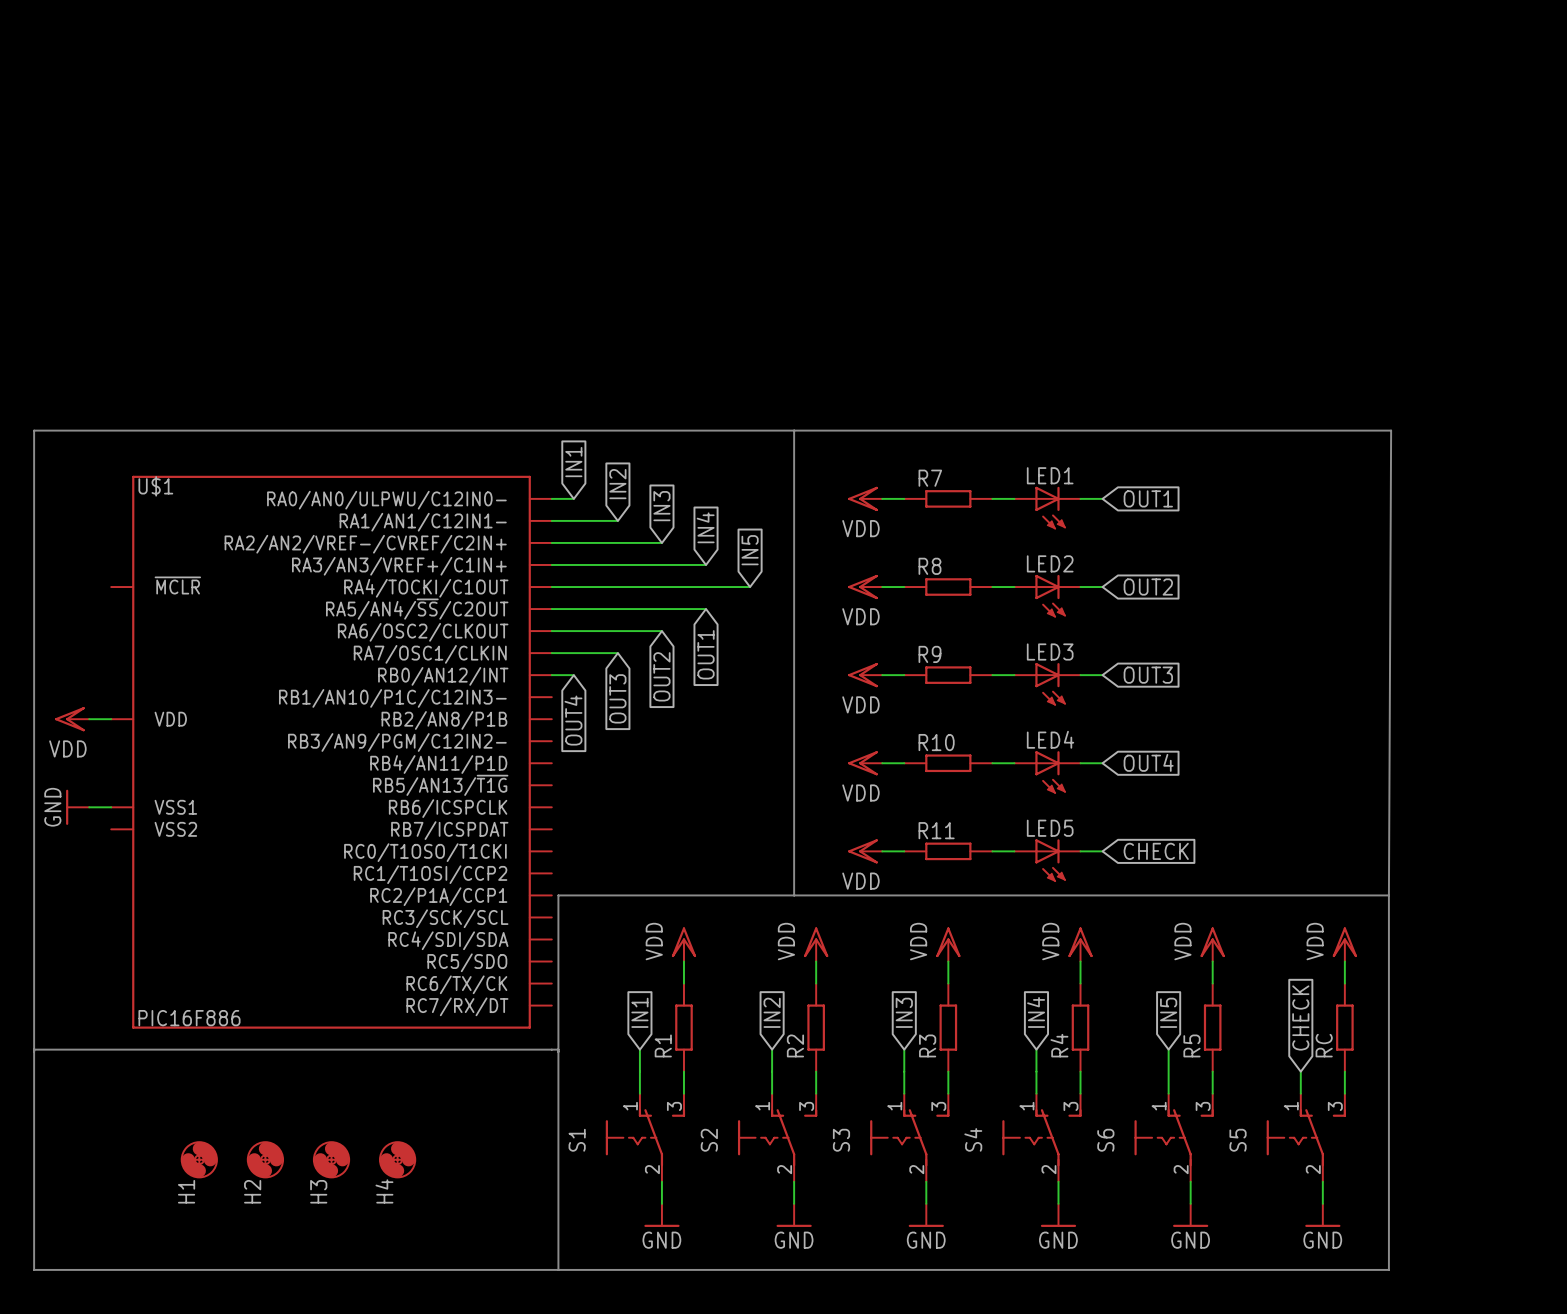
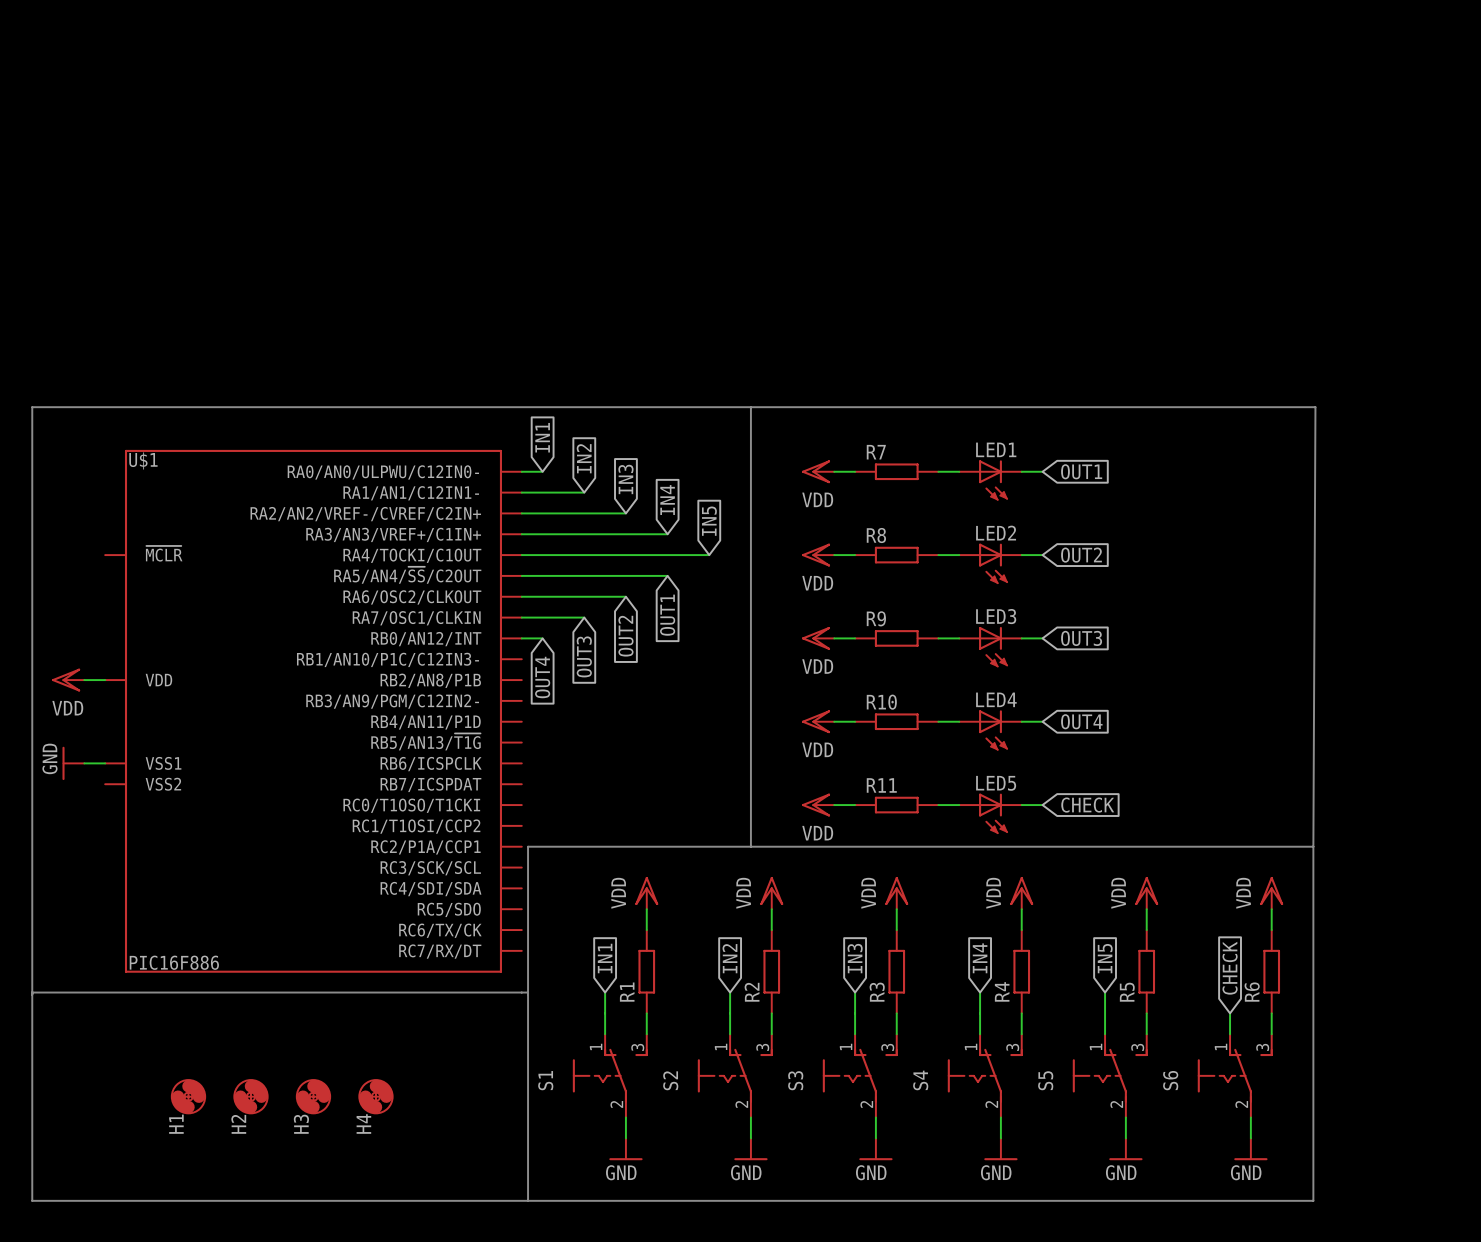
RC name: RC (1324, 1045) -> R6 (1252, 992)
S6 name: S6 (1105, 1140) -> S5 (1045, 1080)
S5 name: S5 (1238, 1140) -> S6 (1170, 1080)

